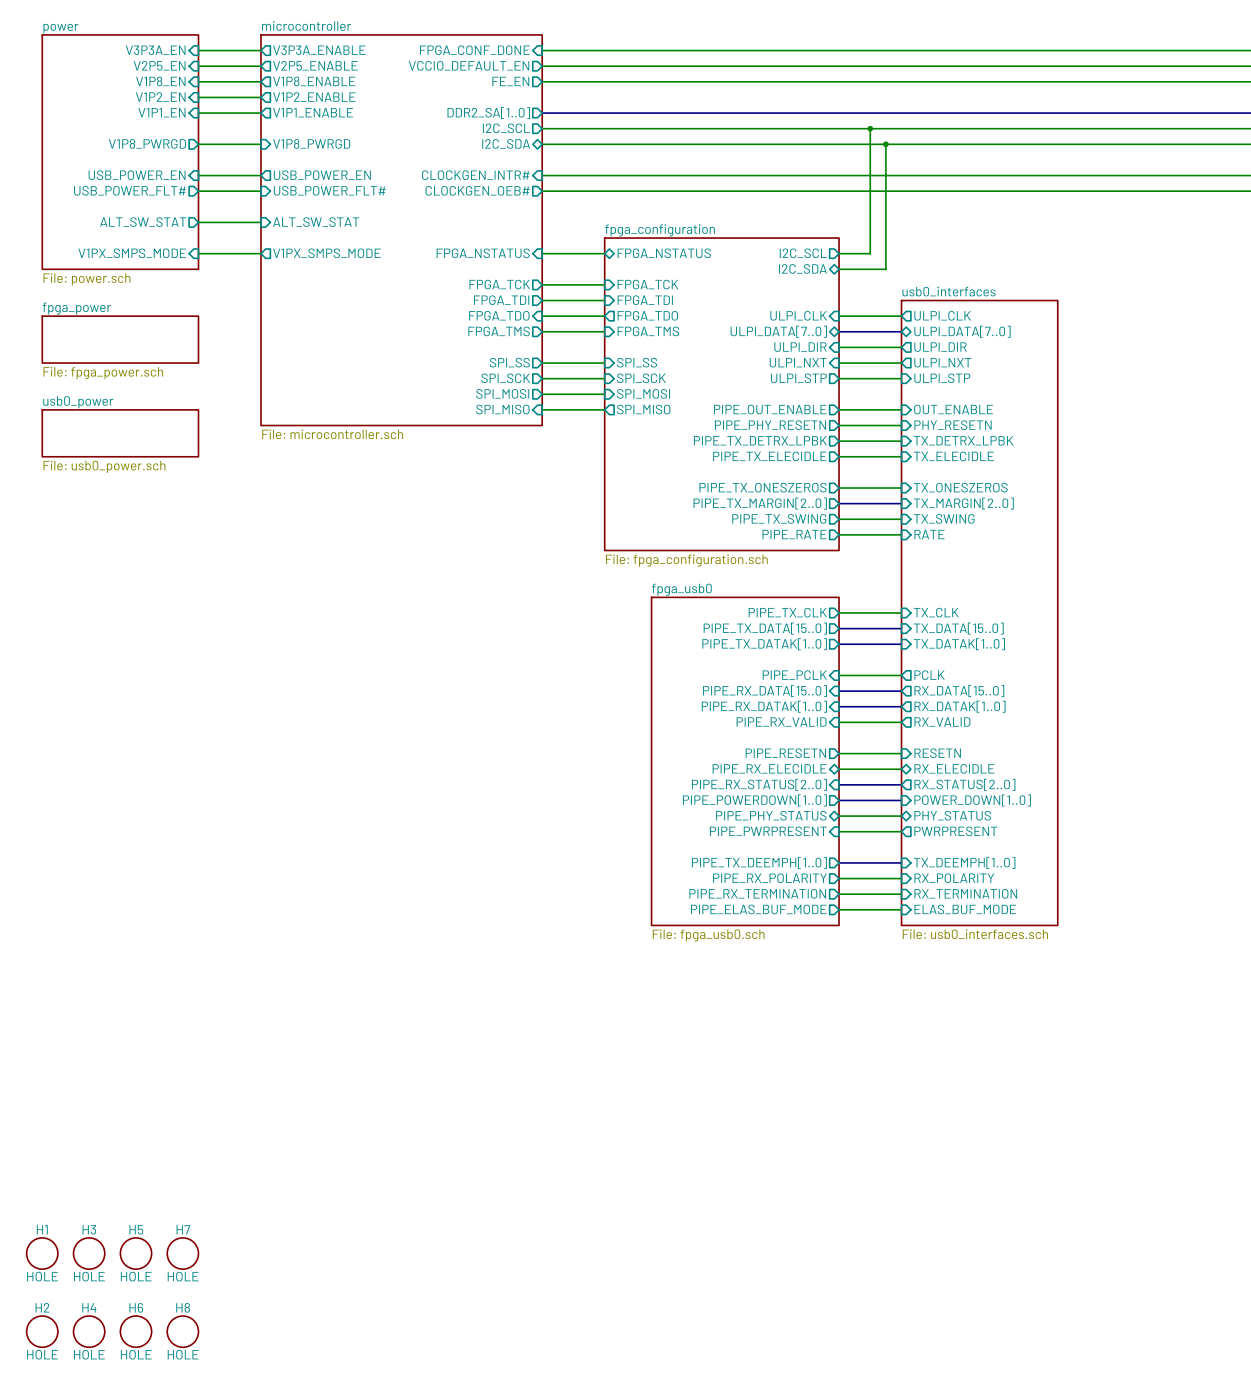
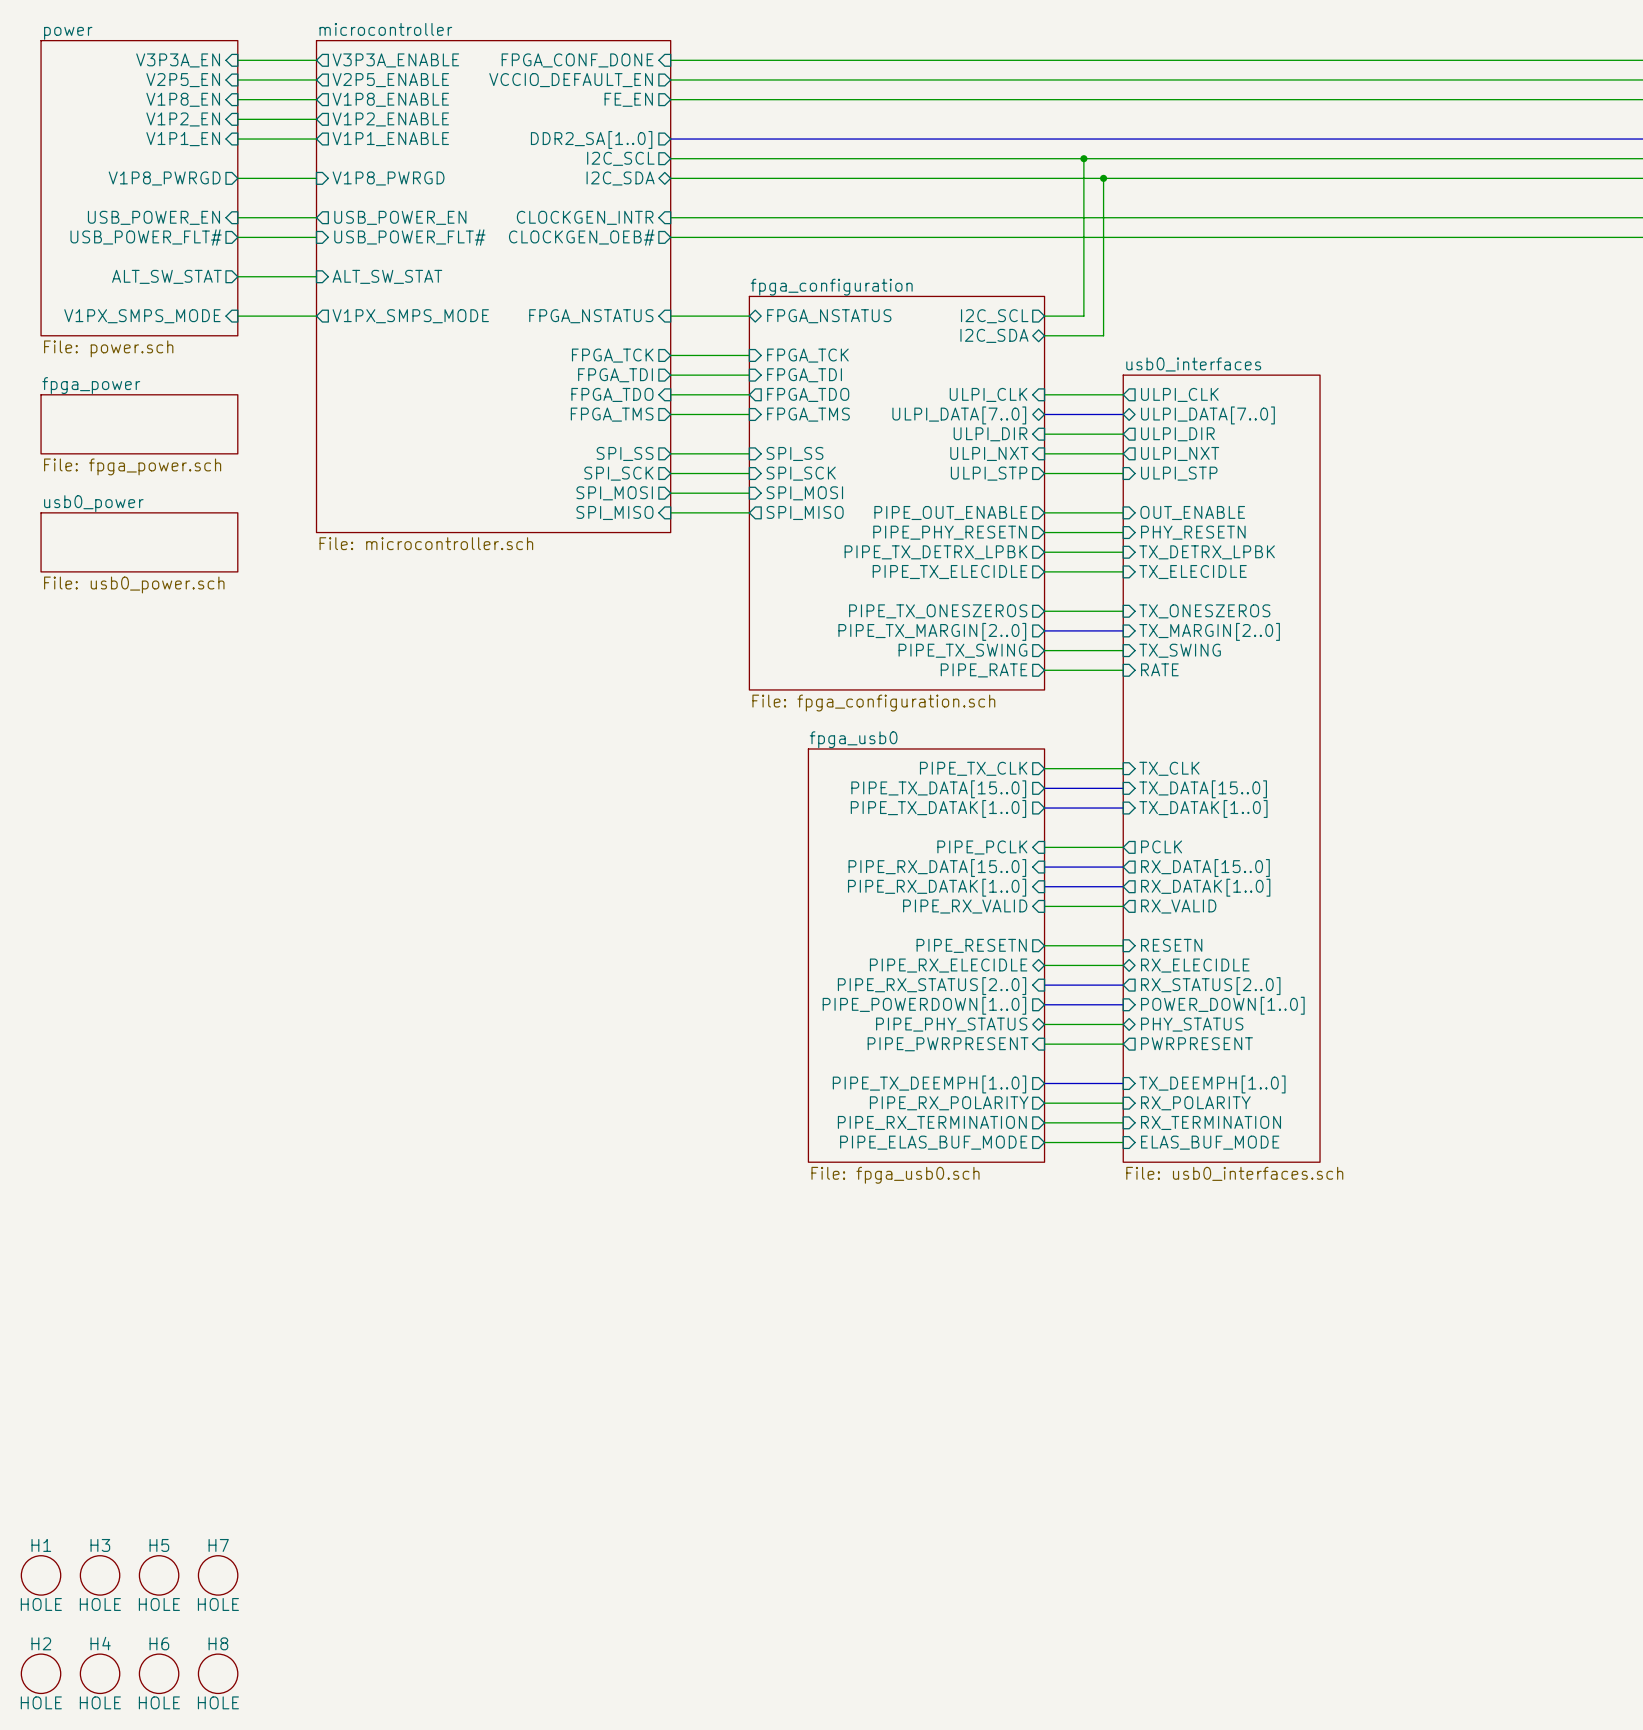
sheet pin: CLOCKGEN_INTR# (475, 175) -> CLOCKGEN_INTR (585, 217)

